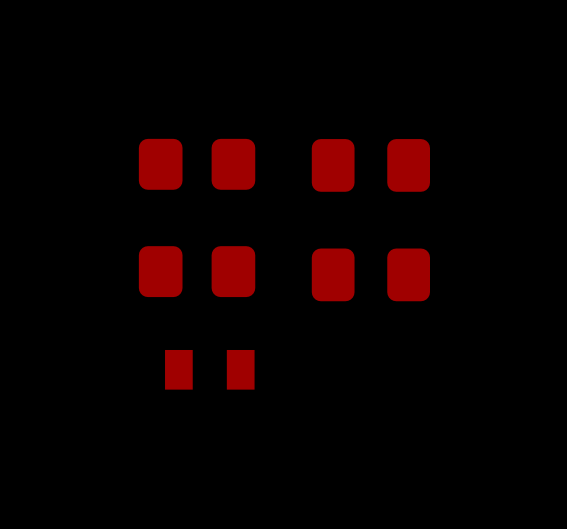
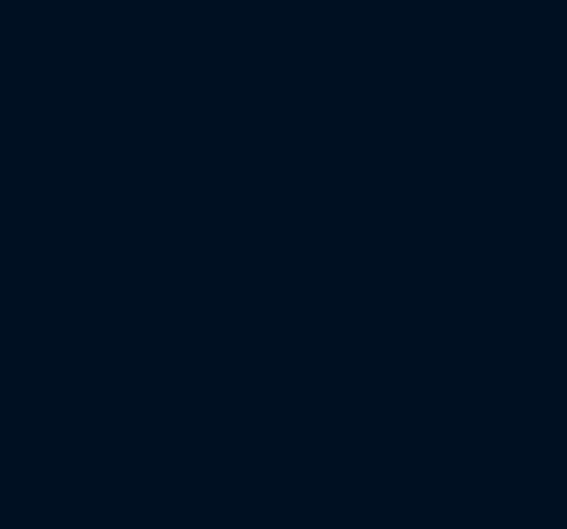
part: (197, 164) -> none
part: (370, 165) -> none
part: (197, 271) -> none
part: (370, 274) -> none
part: (209, 369) -> none

